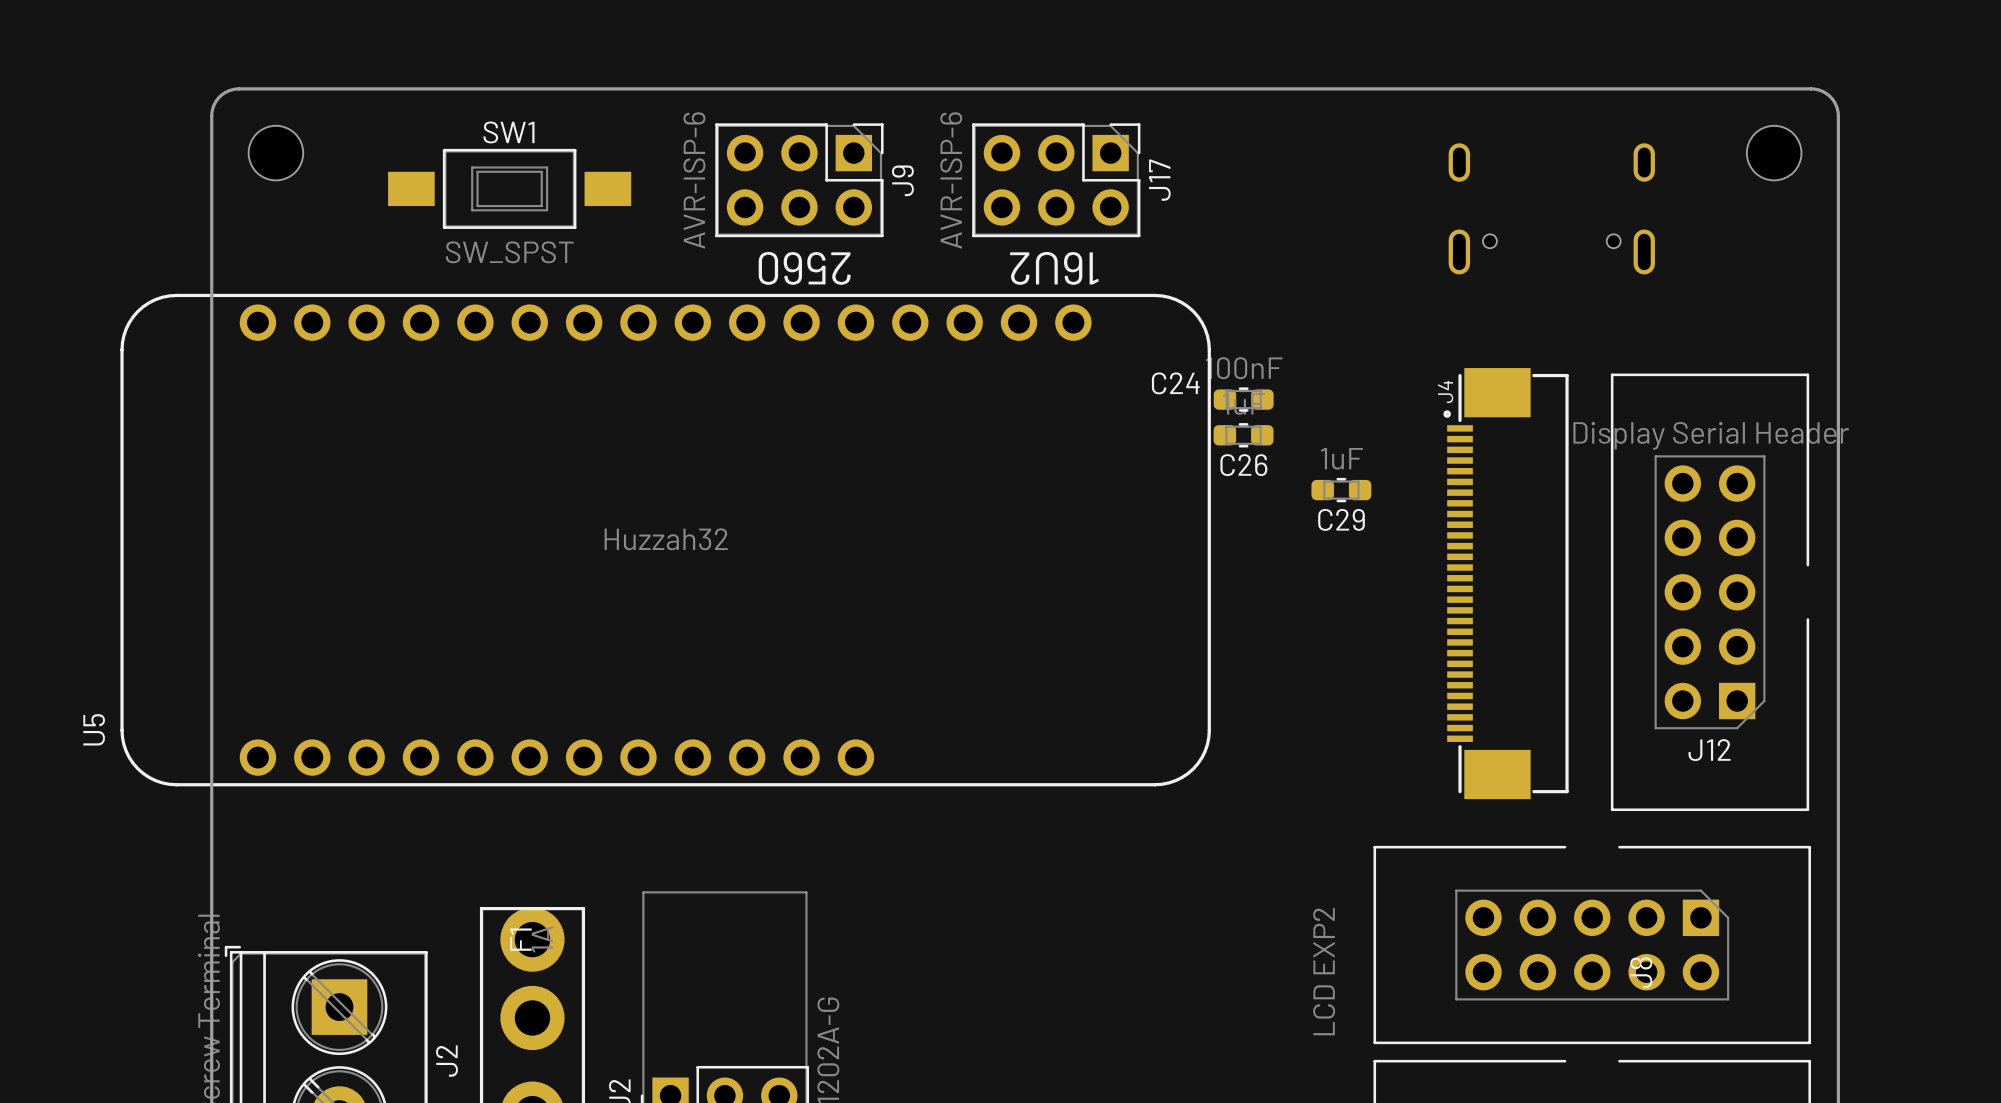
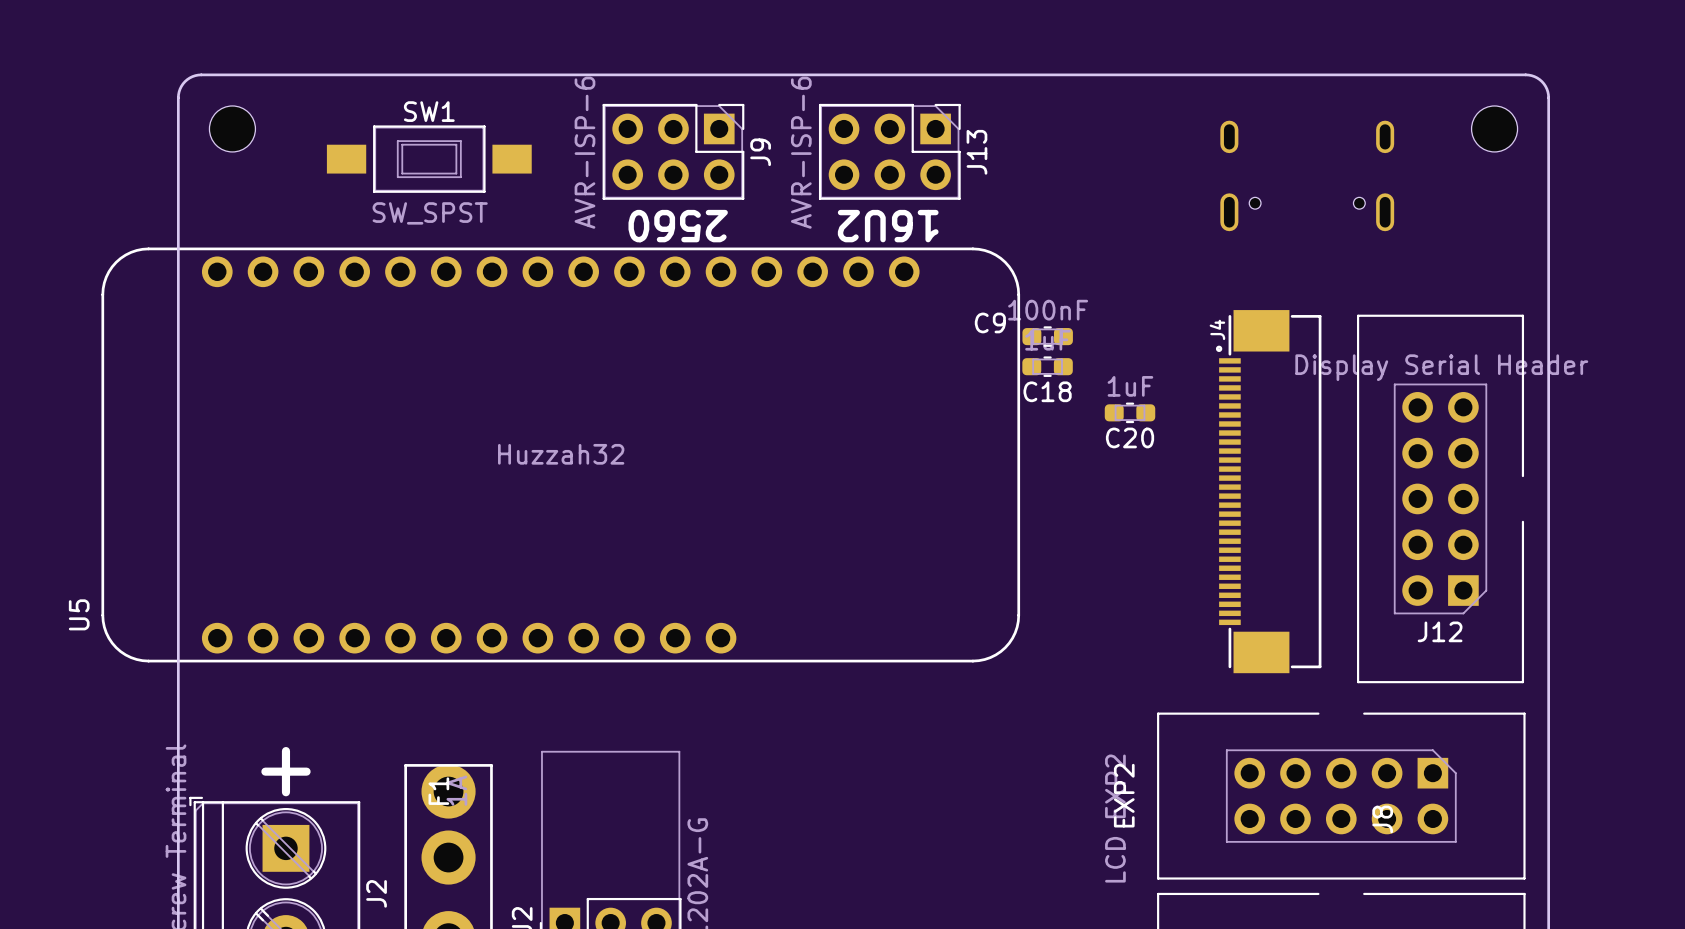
J17 name: J17 (1159, 180) -> J13 (976, 152)
C24 name: C24 (1175, 383) -> C9 (990, 322)
C26 name: C26 (1243, 465) -> C18 (1047, 391)
C29 name: C29 (1341, 519) -> C20 (1130, 437)
text: none -> + (285, 771)
text: none -> EXP2 (1124, 795)

